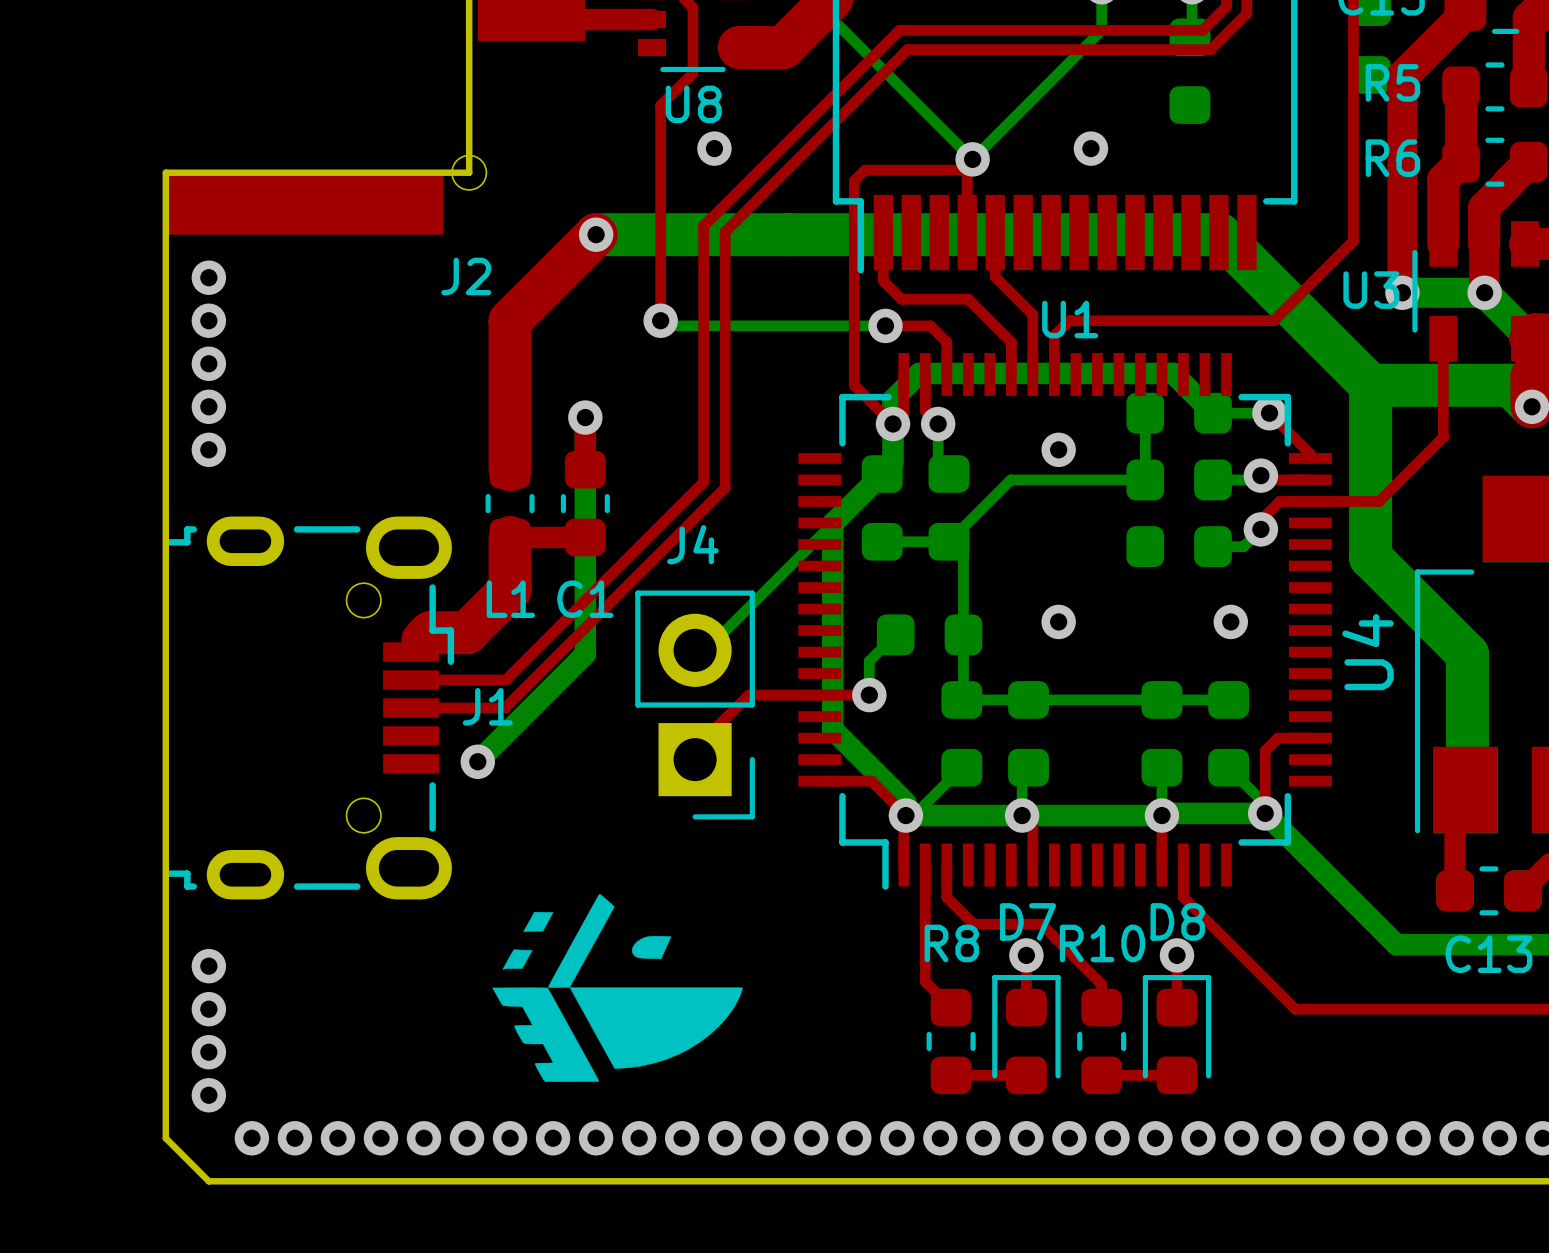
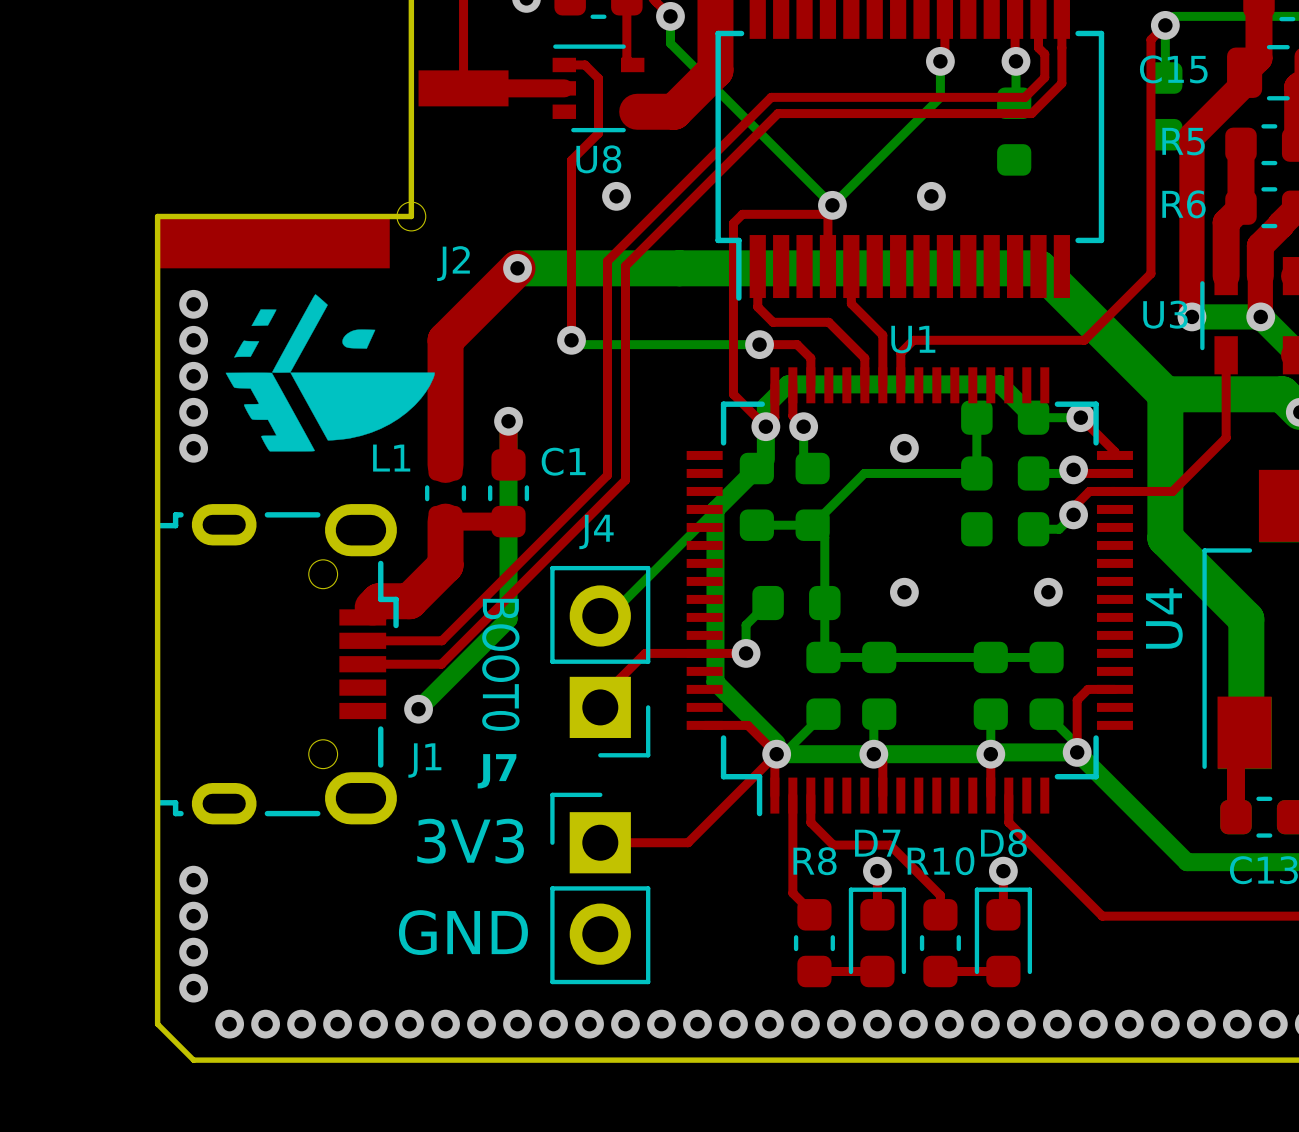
J2 name position: J2 (466, 276) -> J2 (453, 263)
L1 name position: L1 (510, 599) -> L1 (391, 458)
C1 name position: C1 (585, 599) -> C1 (563, 461)
J1 name position: J1 (487, 706) -> J1 (424, 760)
text: none -> BOOT0 (500, 664)
top track: none -> (774, 756) (688, 842) (600, 842)
text: none -> 3V3 (470, 841)
J7: none -> (600, 888)
drawing position: (617, 987) -> (330, 372)
text: none -> GND (463, 932)

